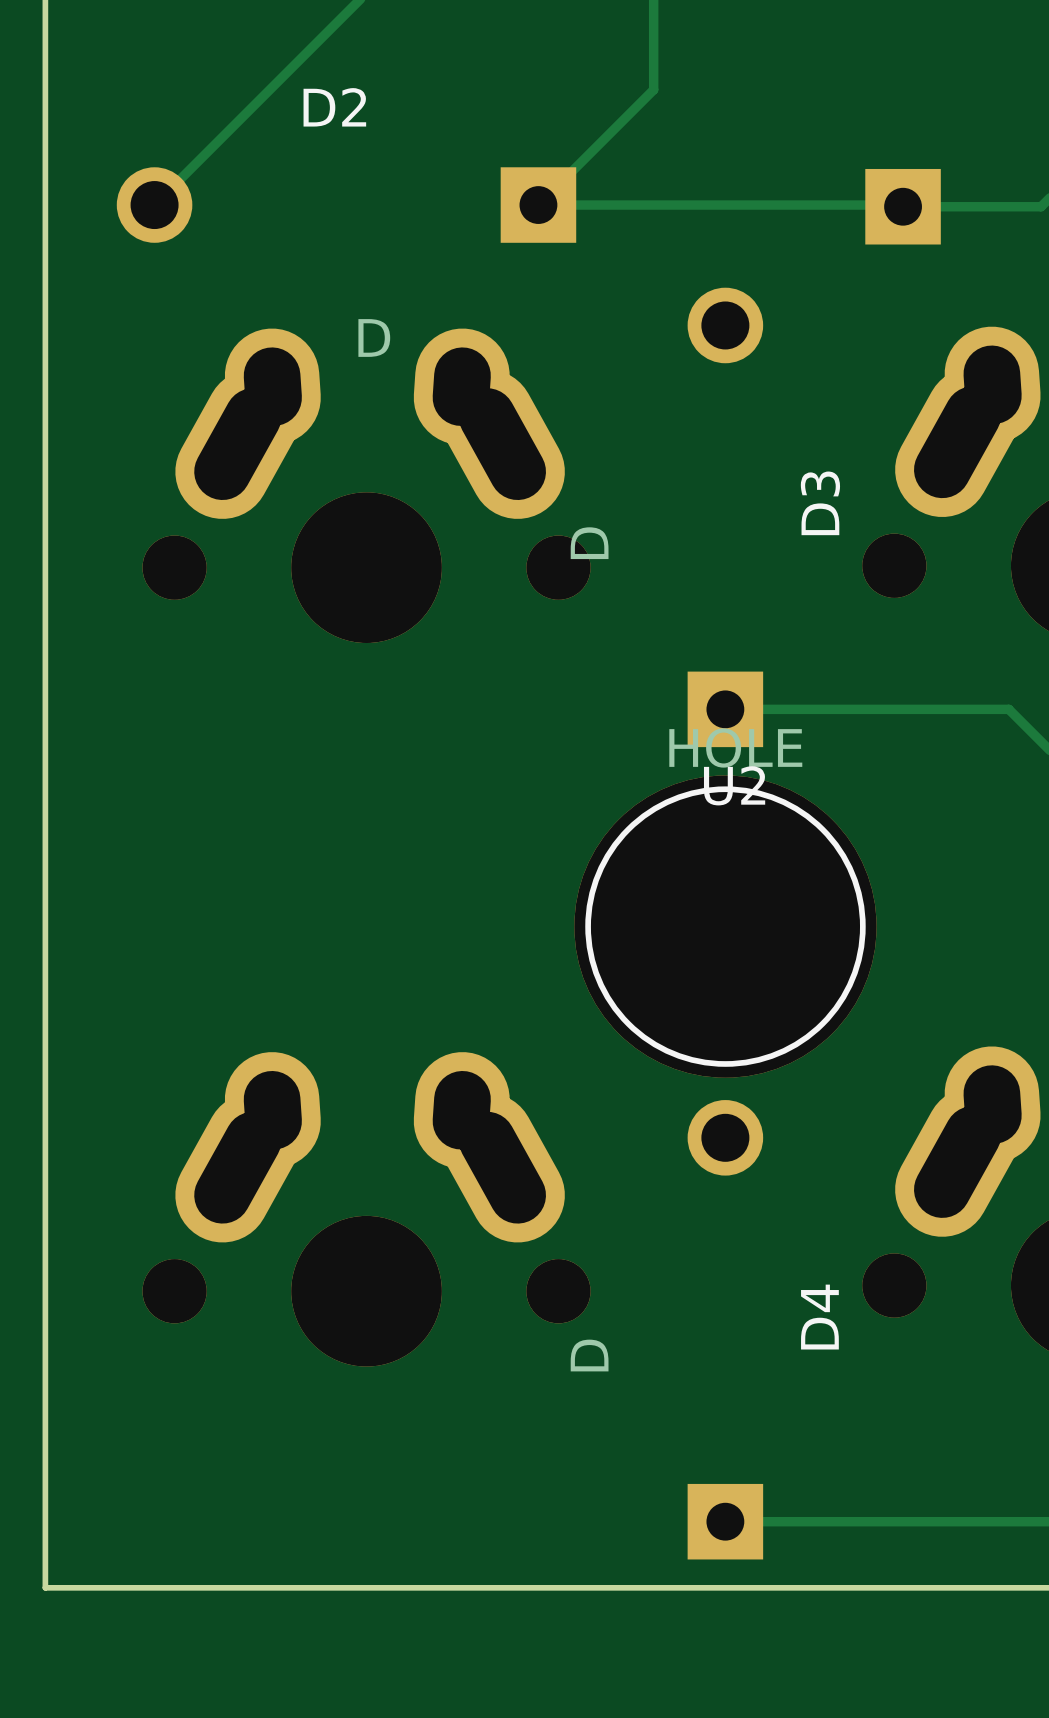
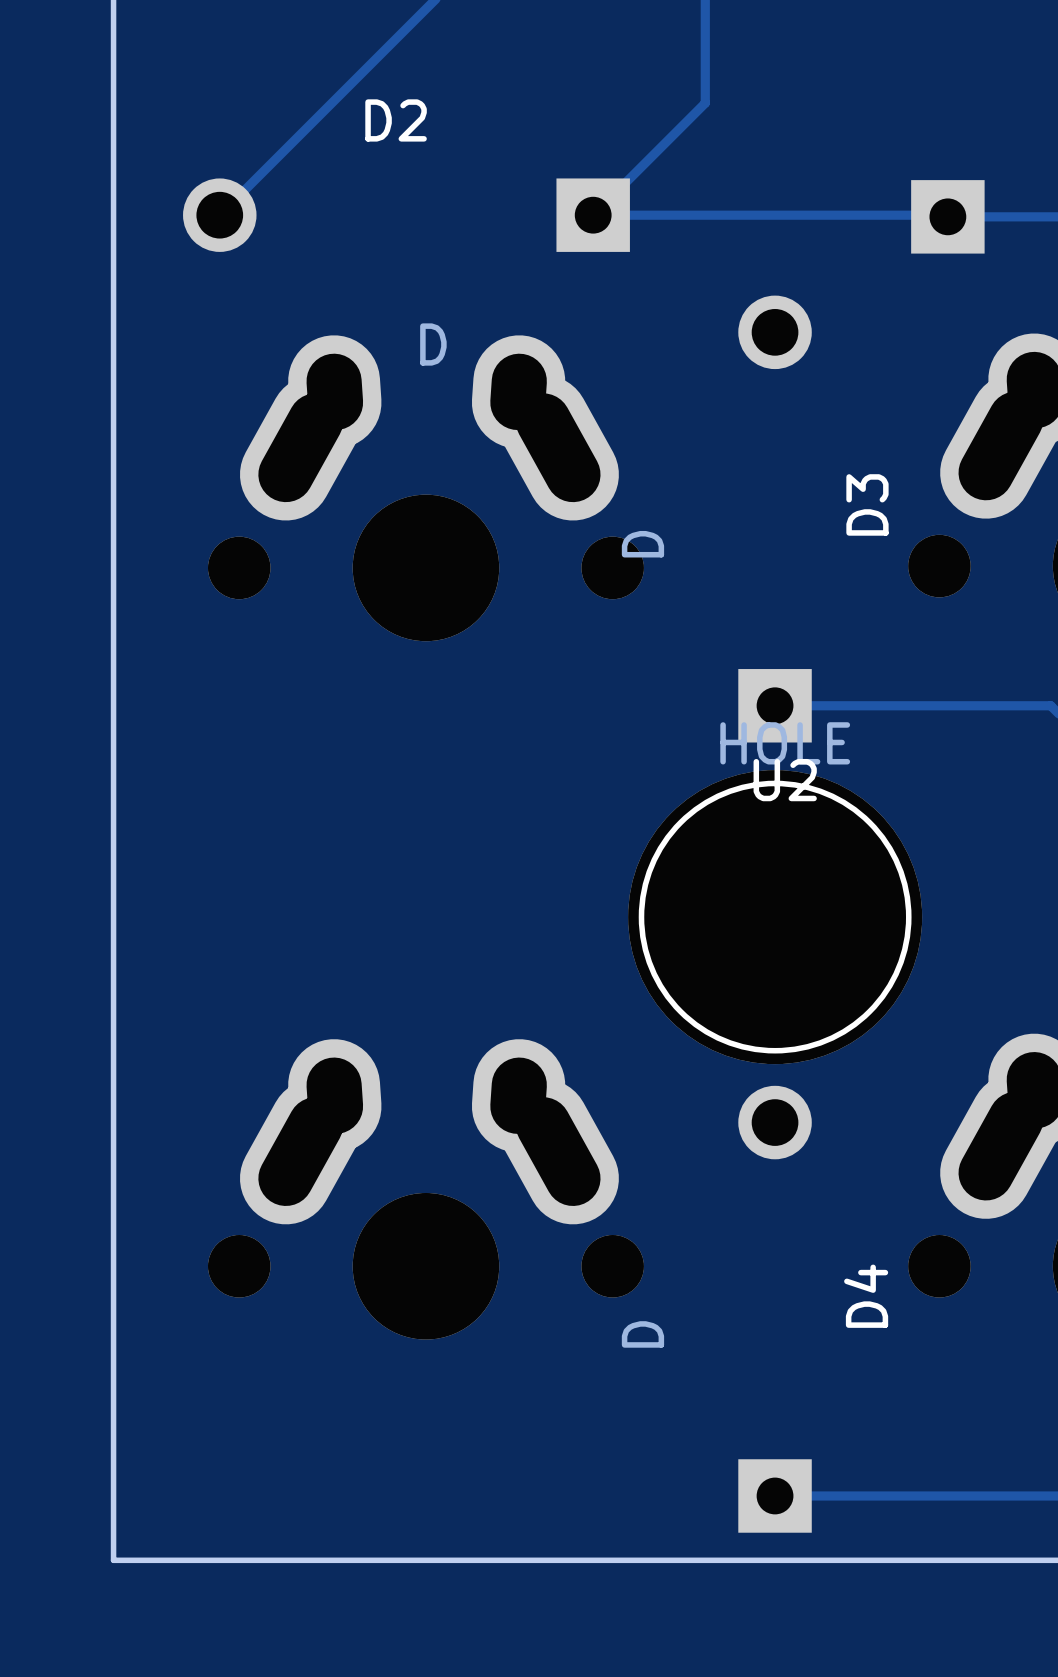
part footprint: [142, 1052, 591, 1367] -> [207, 1039, 644, 1340]

